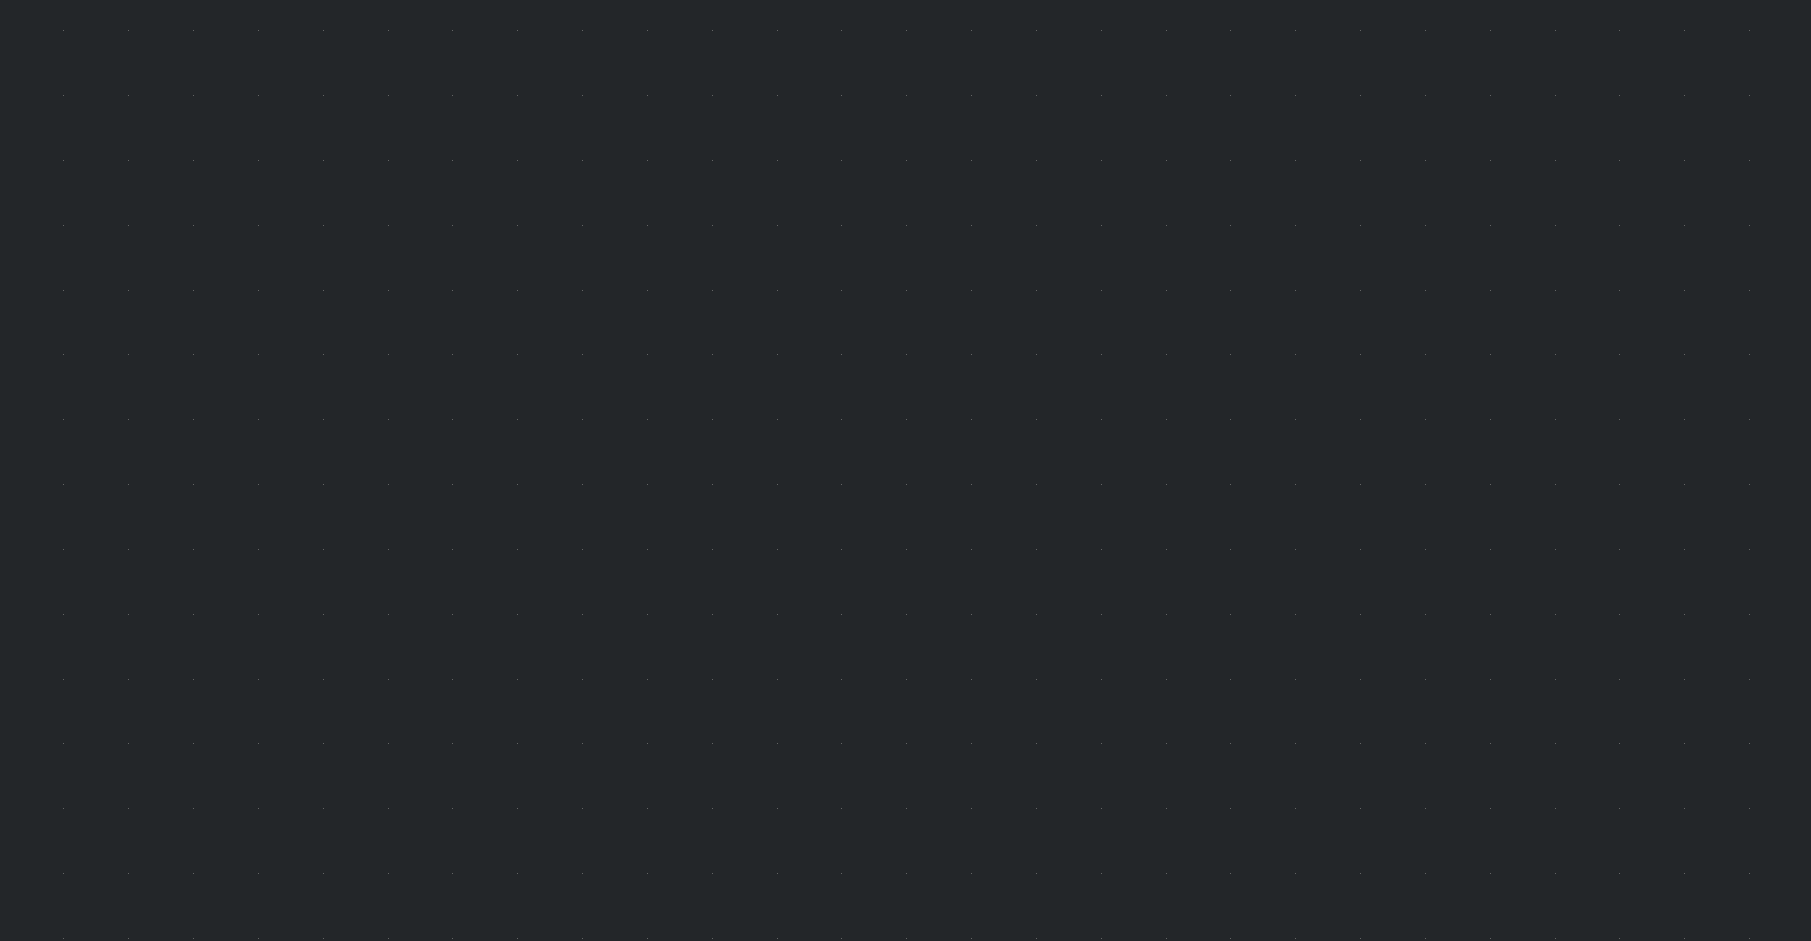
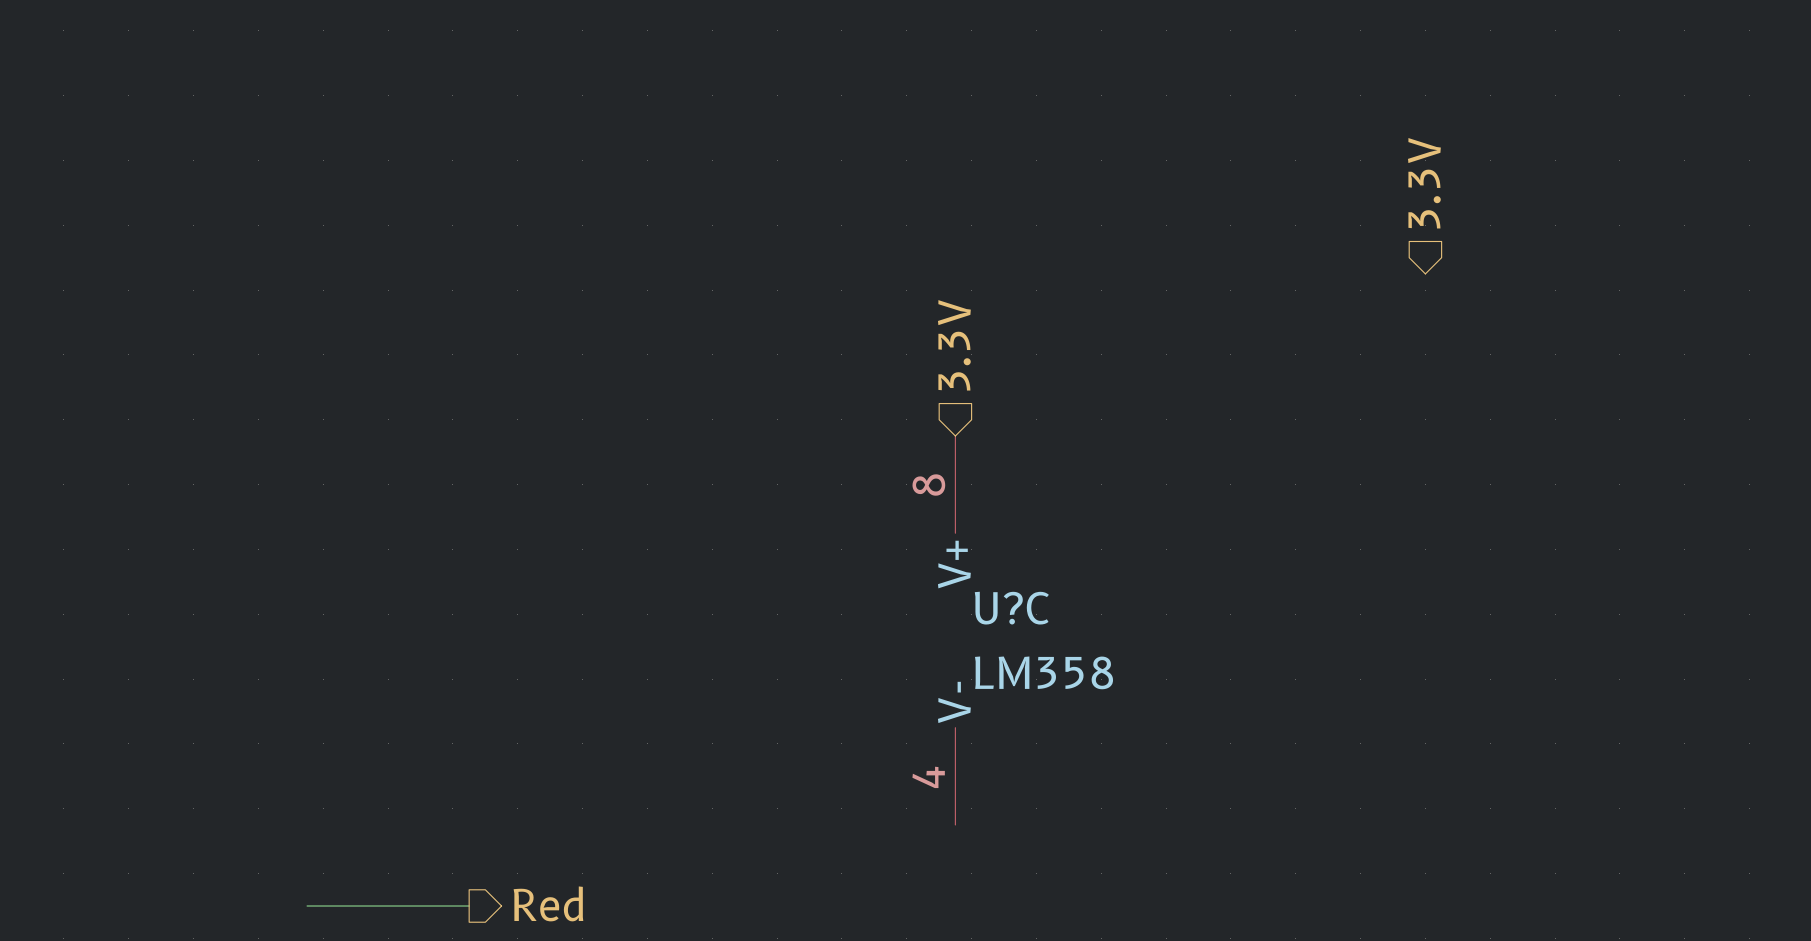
hierarchical label: none -> 3.3V (1424, 183)
hierarchical label: none -> 3.3V (954, 345)
U?C: none -> LM358 (955, 630)
hierarchical label: none -> Red (548, 903)
wire: none -> (307, 906) (469, 906)

